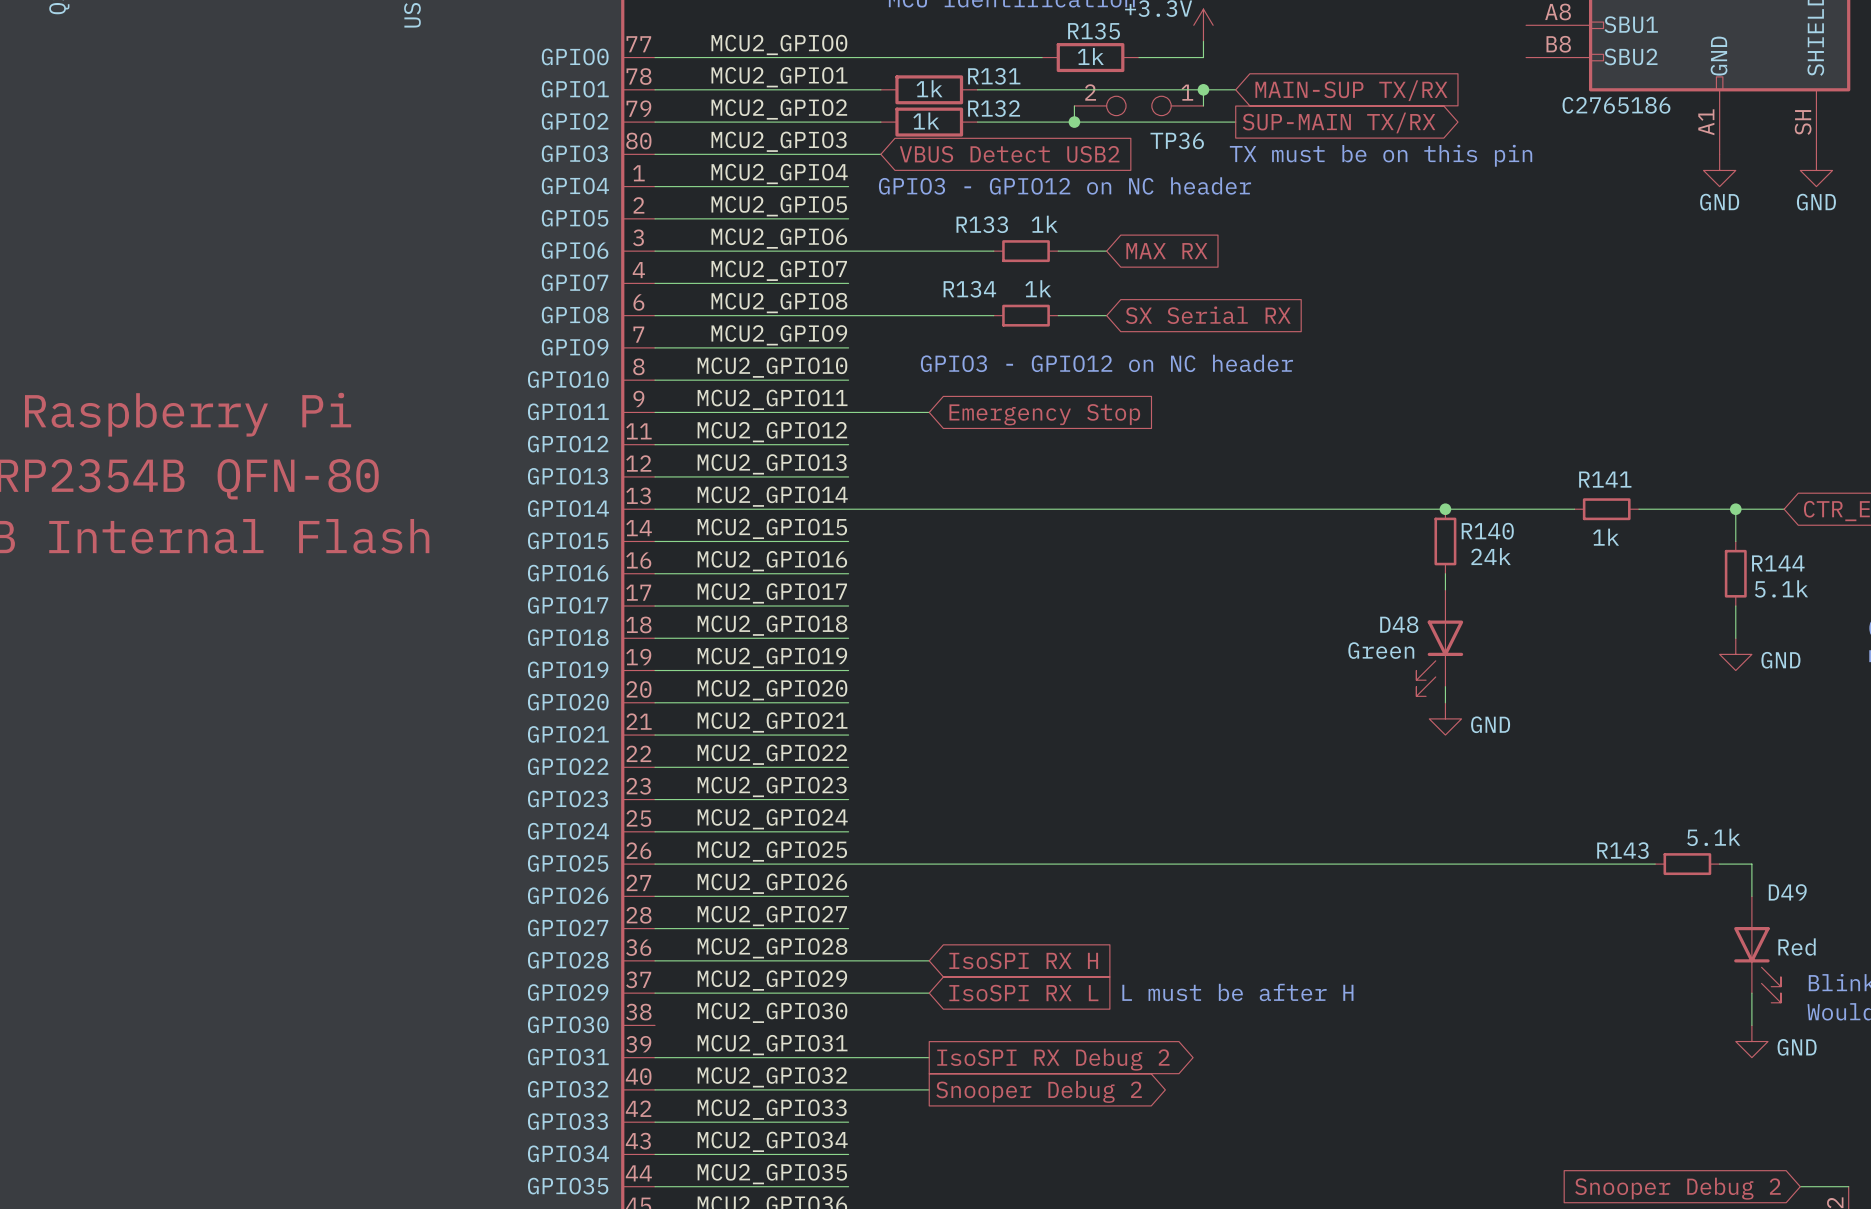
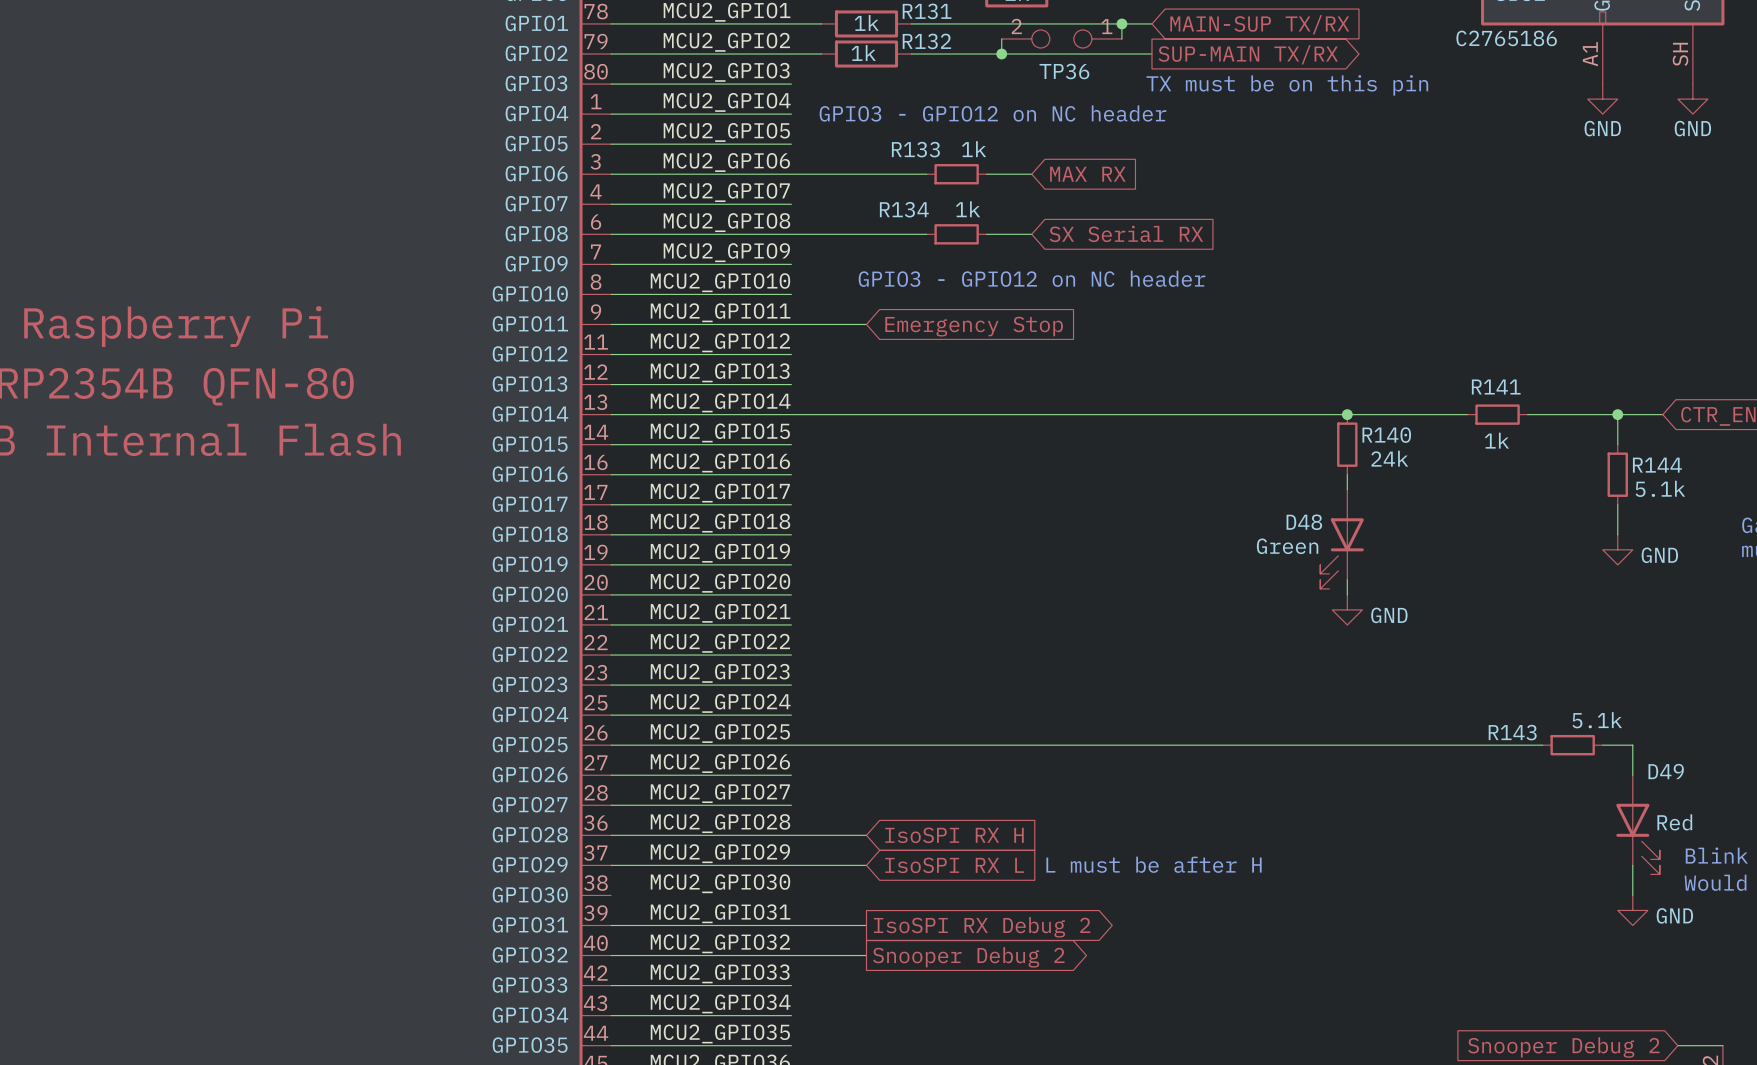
TP36 name position: TP36 (1177, 140) -> TP36 (1064, 71)
wire: (848, 154) (880, 154) -> none
global label: VBUS Detect USB2 (1009, 154) -> none

